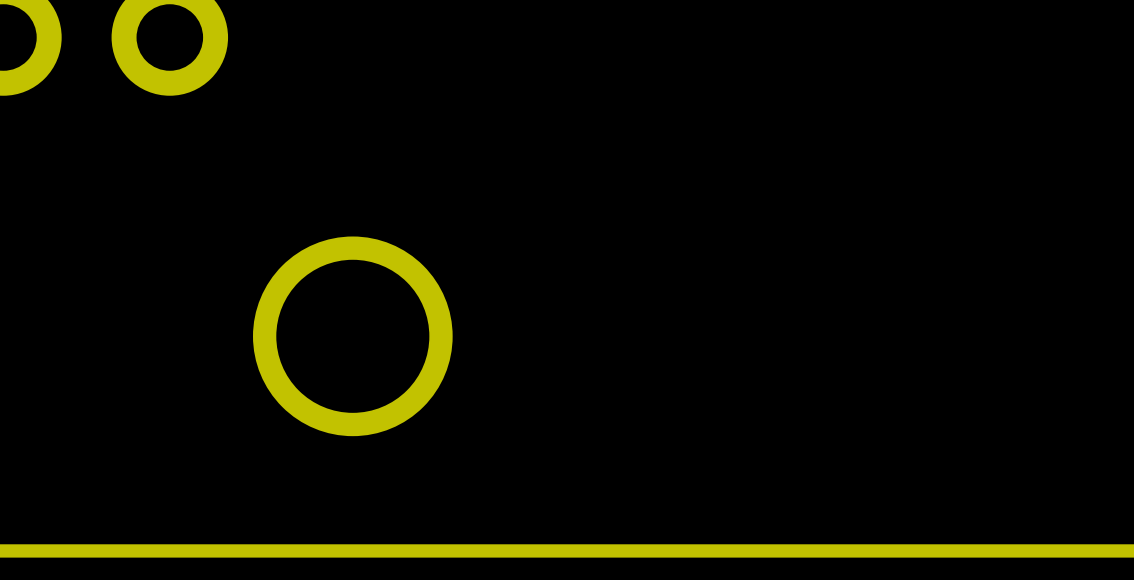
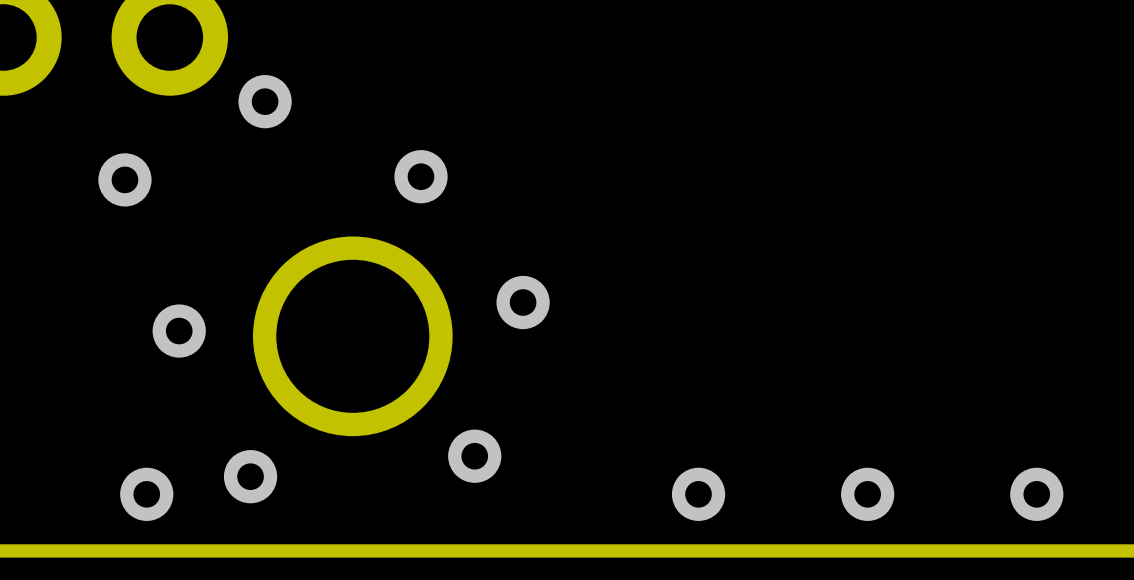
via: none -> (265, 101)
via: none -> (421, 176)
via: none -> (124, 179)
via: none -> (523, 302)
via: none -> (179, 331)
via: none -> (474, 456)
via: none -> (250, 476)
via: none -> (146, 494)
via: none -> (698, 494)
via: none -> (867, 494)
via: none -> (1036, 494)

